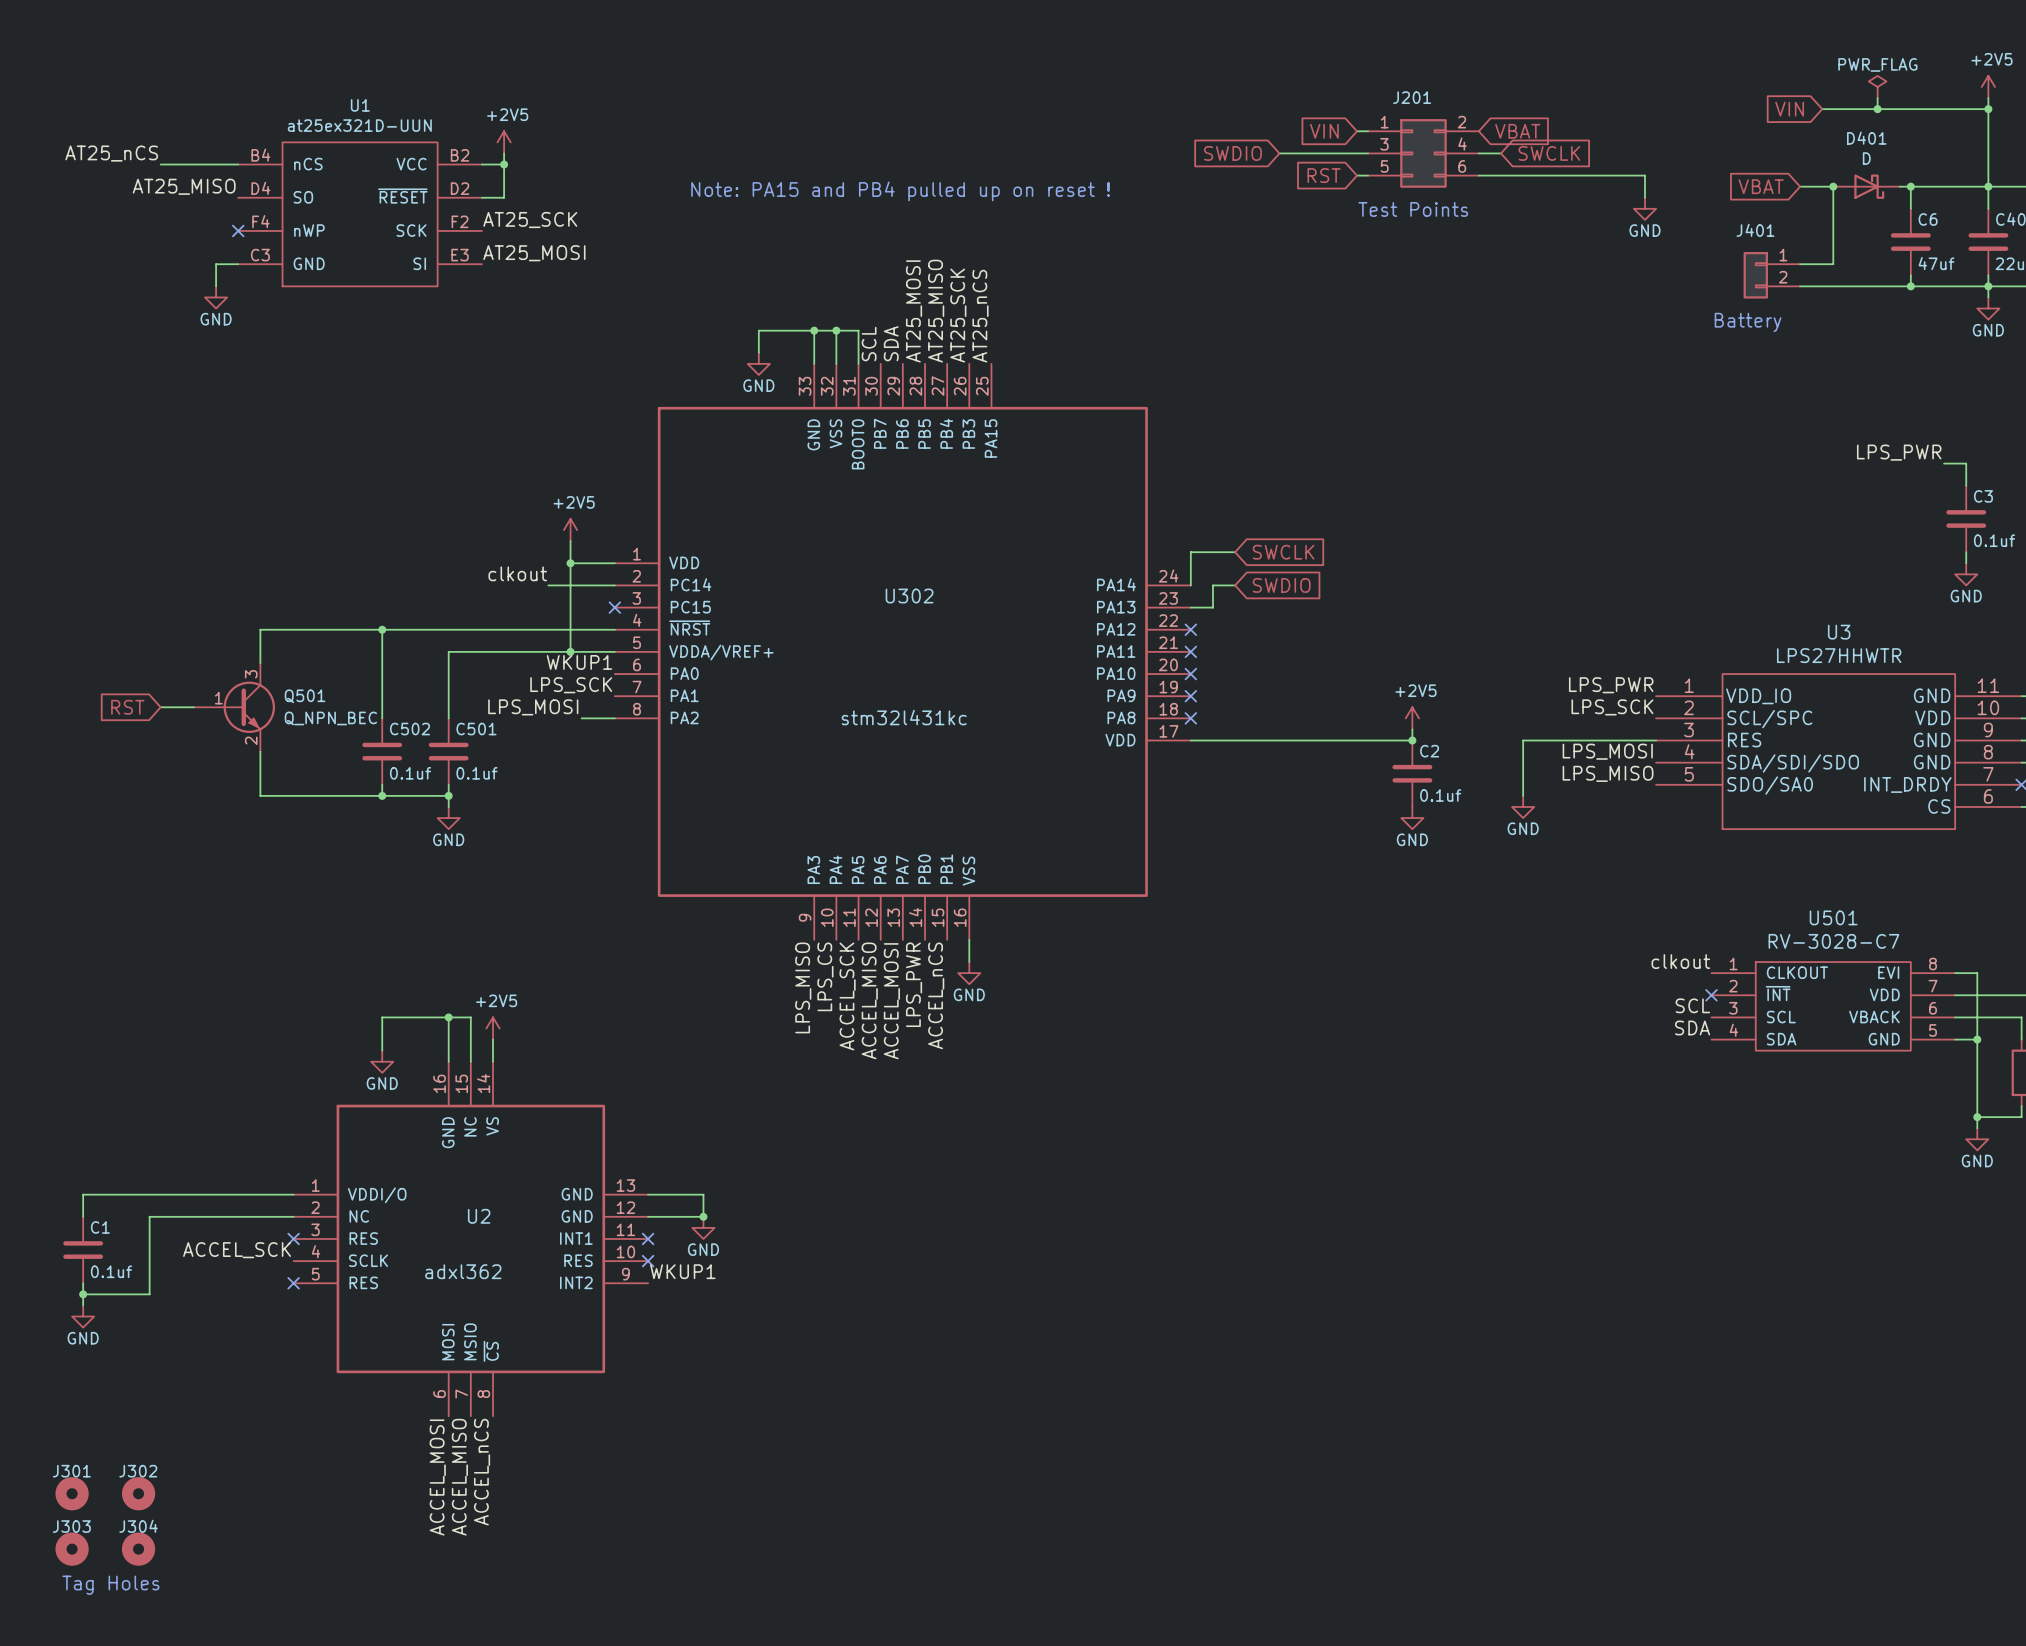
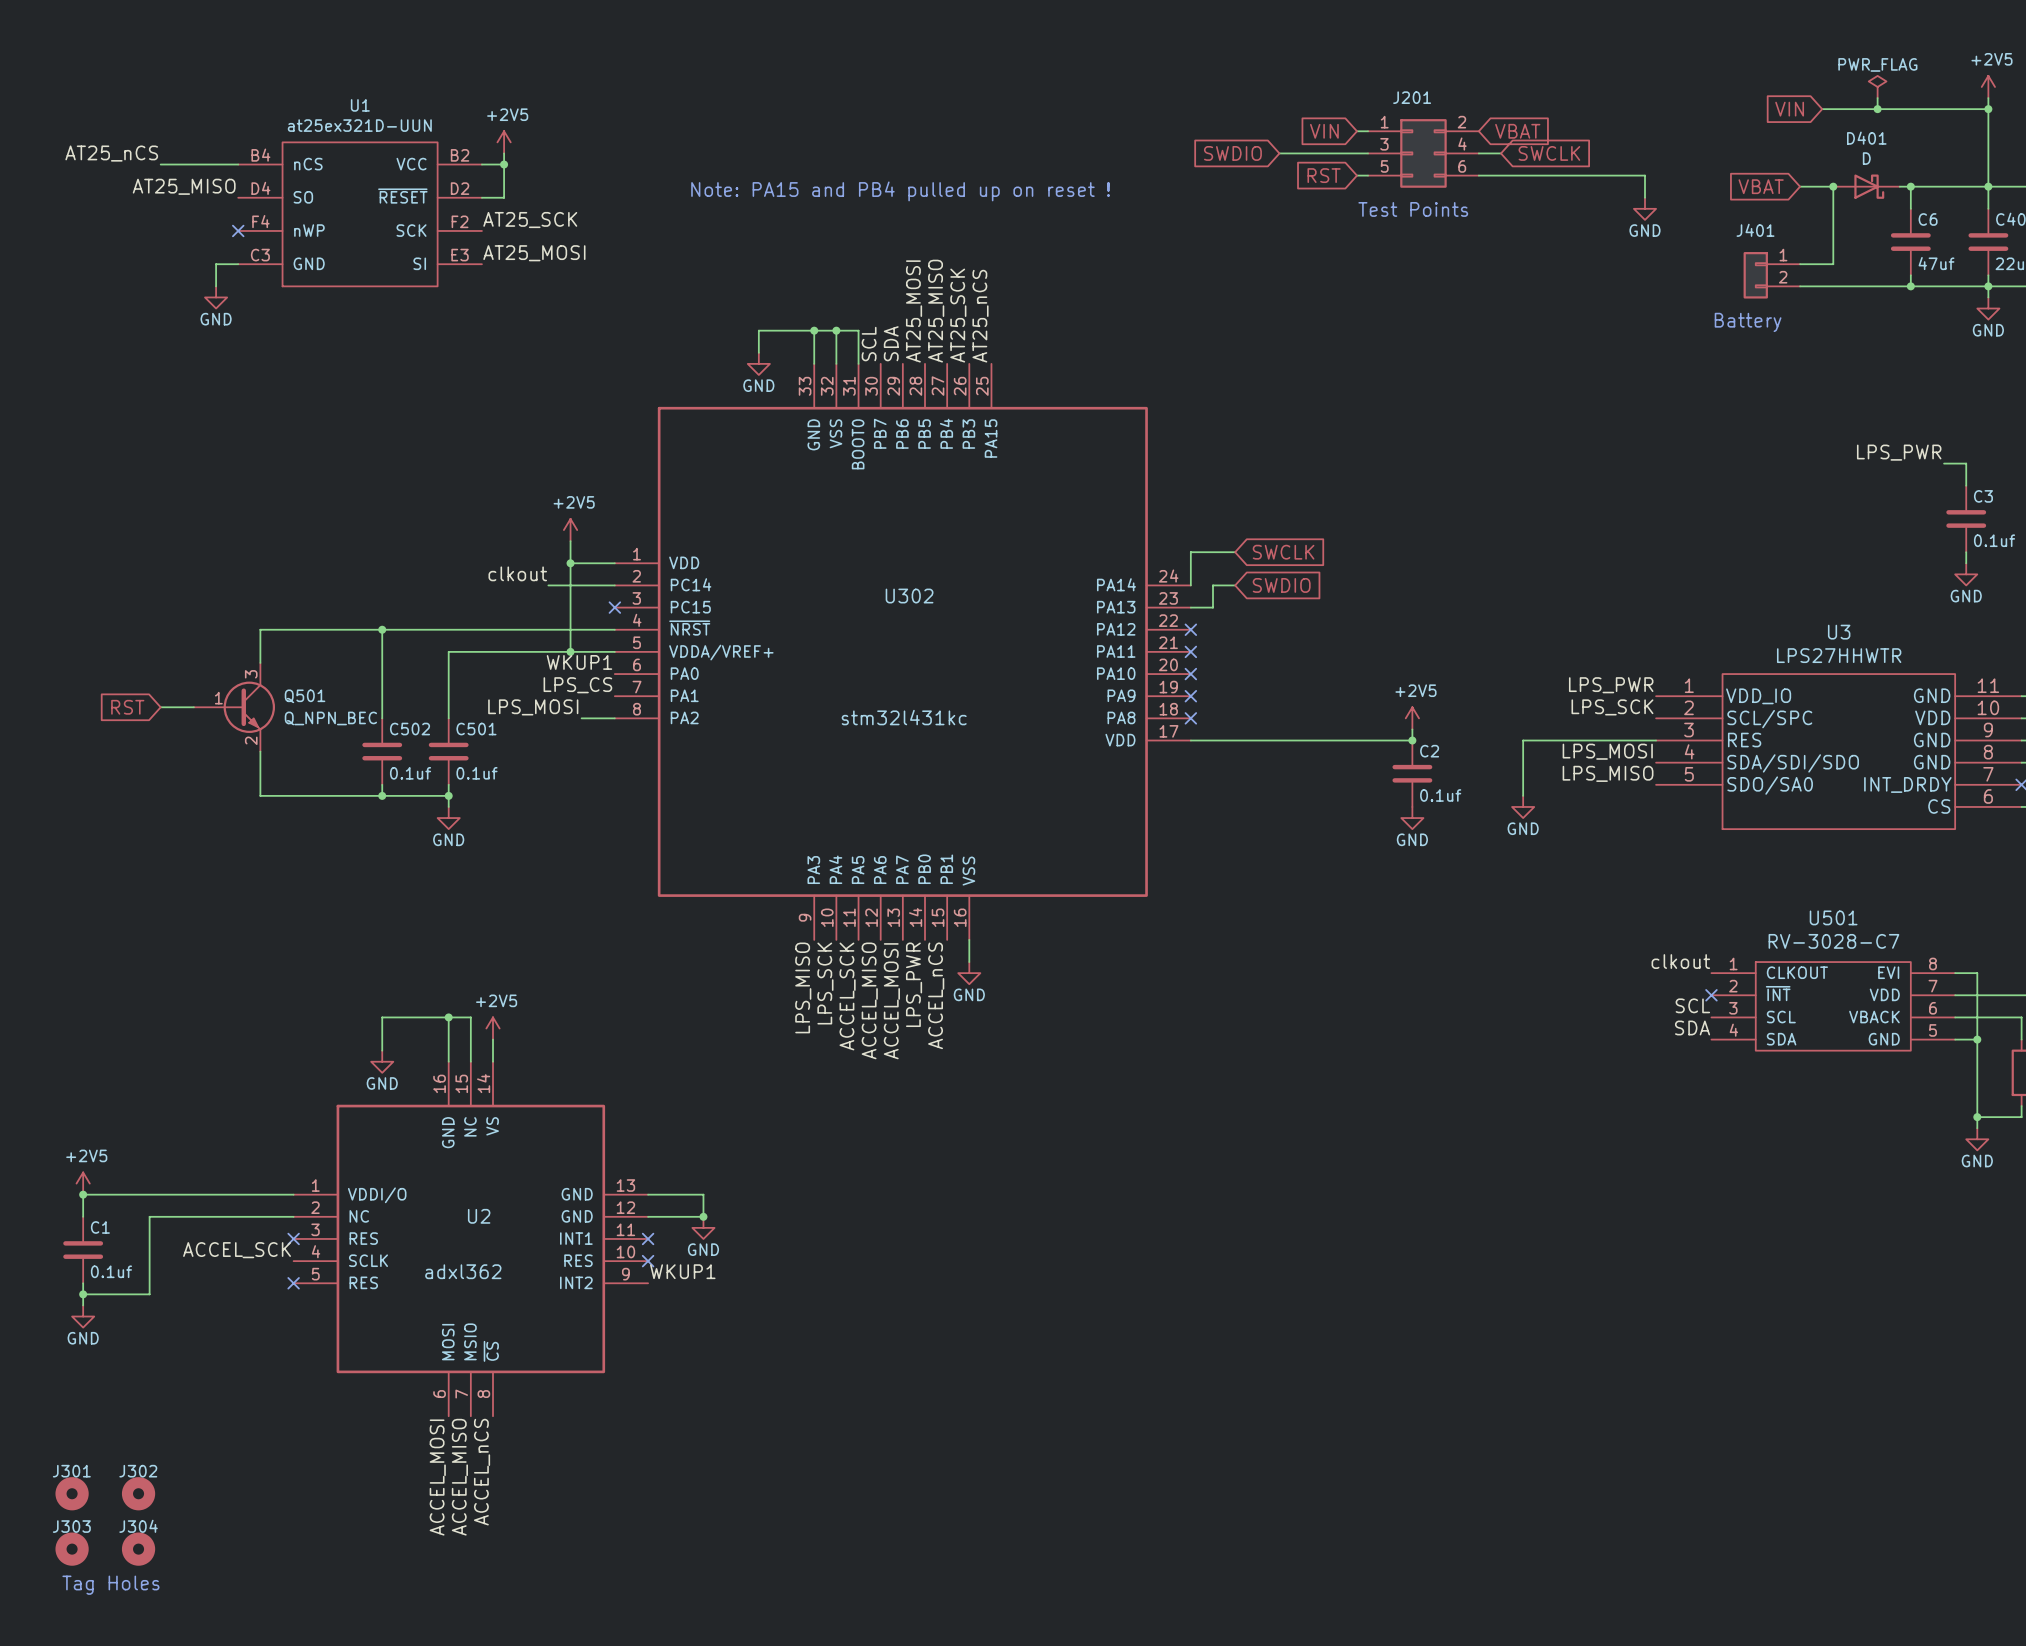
label: LPS_SCK (571, 685) -> LPS_CS (577, 685)
label: LPS_CS (825, 976) -> LPS_SCK (825, 983)
power symbol: none -> +2V5 (83, 1183)
junction: none -> (83, 1194)

